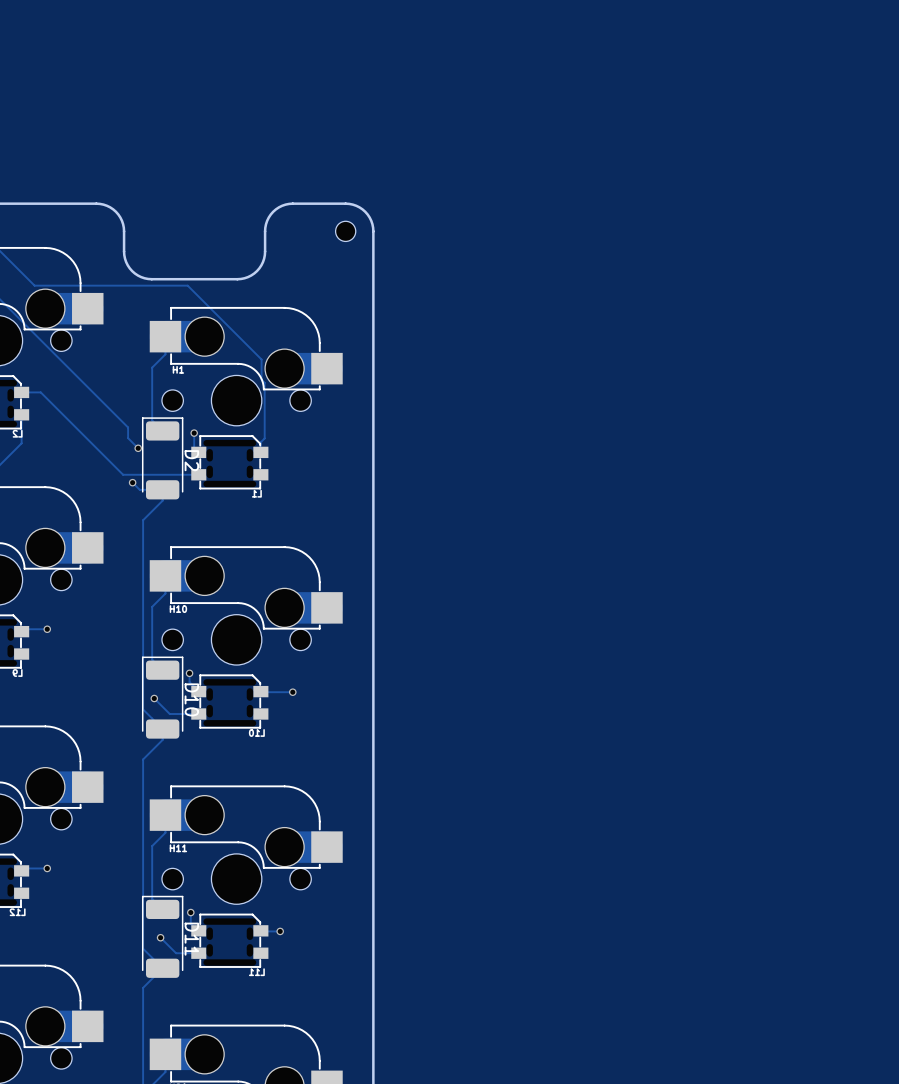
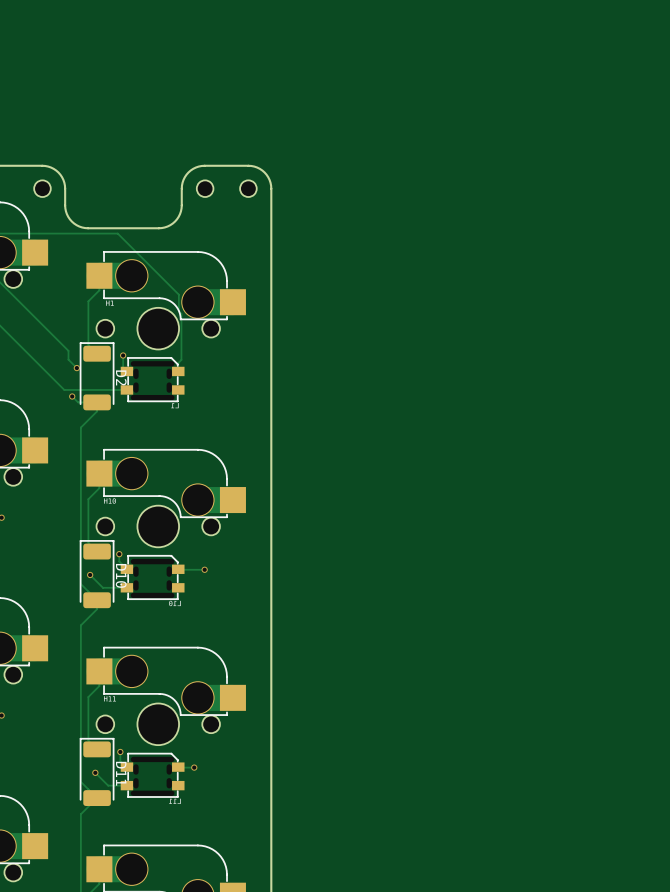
part: none -> (42, 188)
part: none -> (205, 188)

